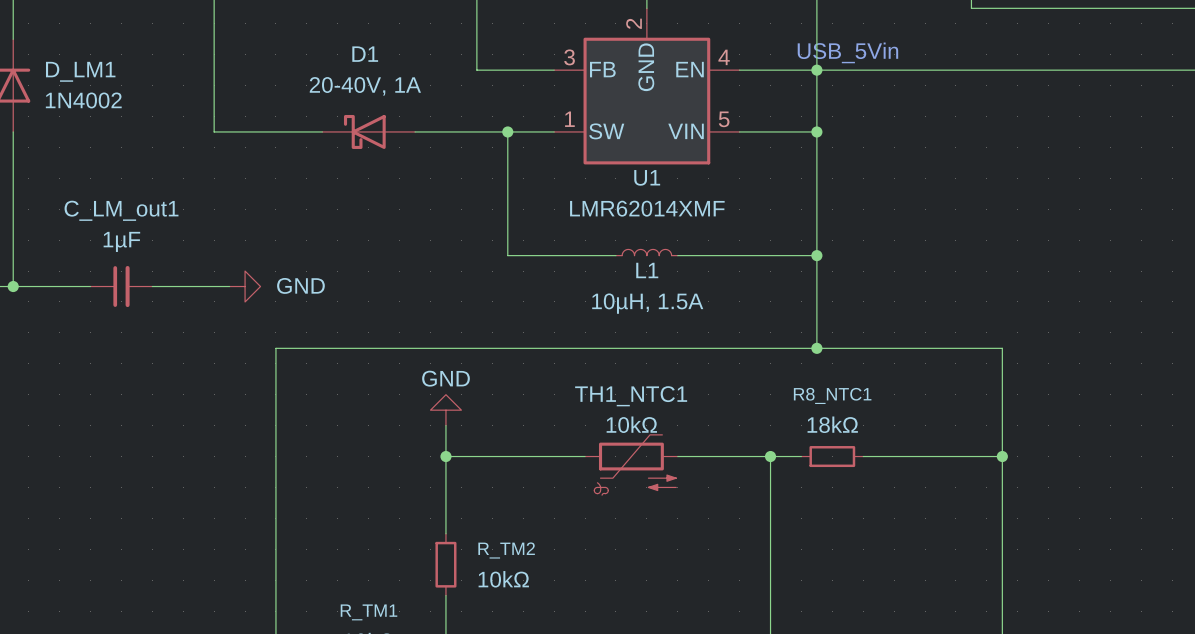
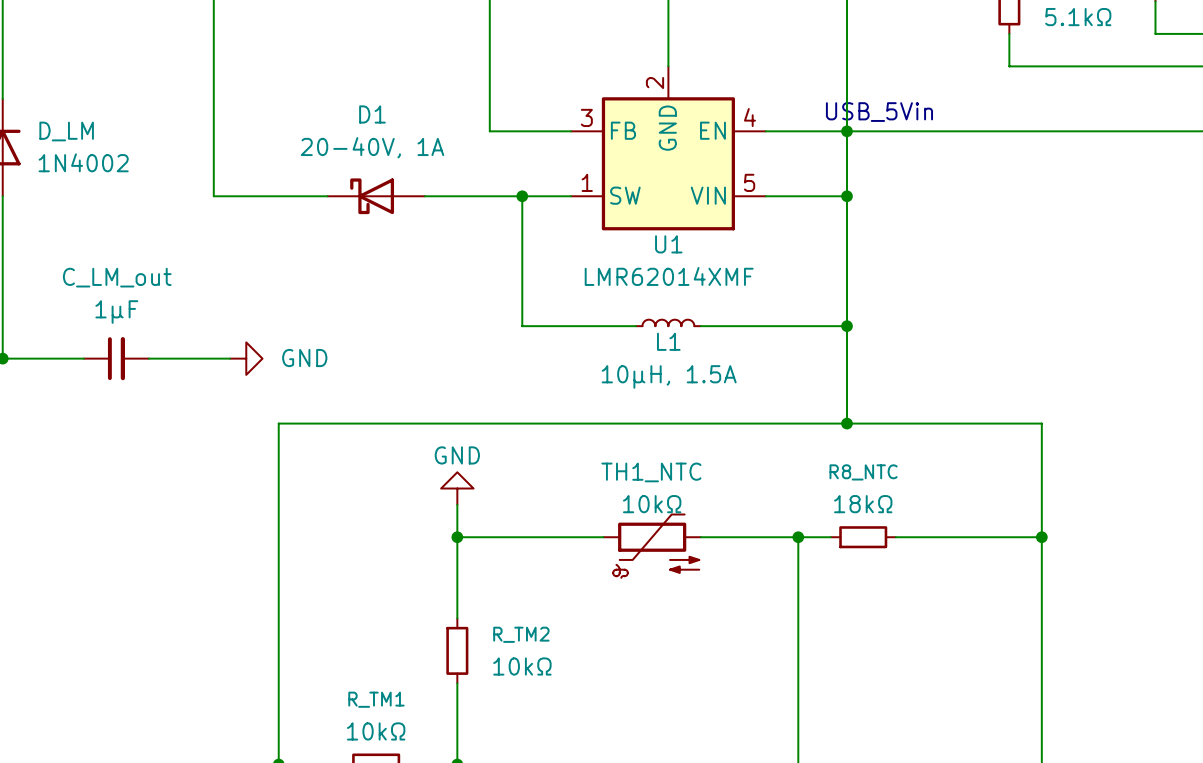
D_LM1 name: D_LM1 (80, 71) -> D_LM (66, 131)
C_LM_out1 name: C_LM_out1 (121, 210) -> C_LM_out (117, 277)
R8_NTC1 name: R8_NTC1 (832, 395) -> R8_NTC (863, 472)
TH1_NTC1 name: TH1_NTC1 (631, 396) -> TH1_NTC (651, 472)

